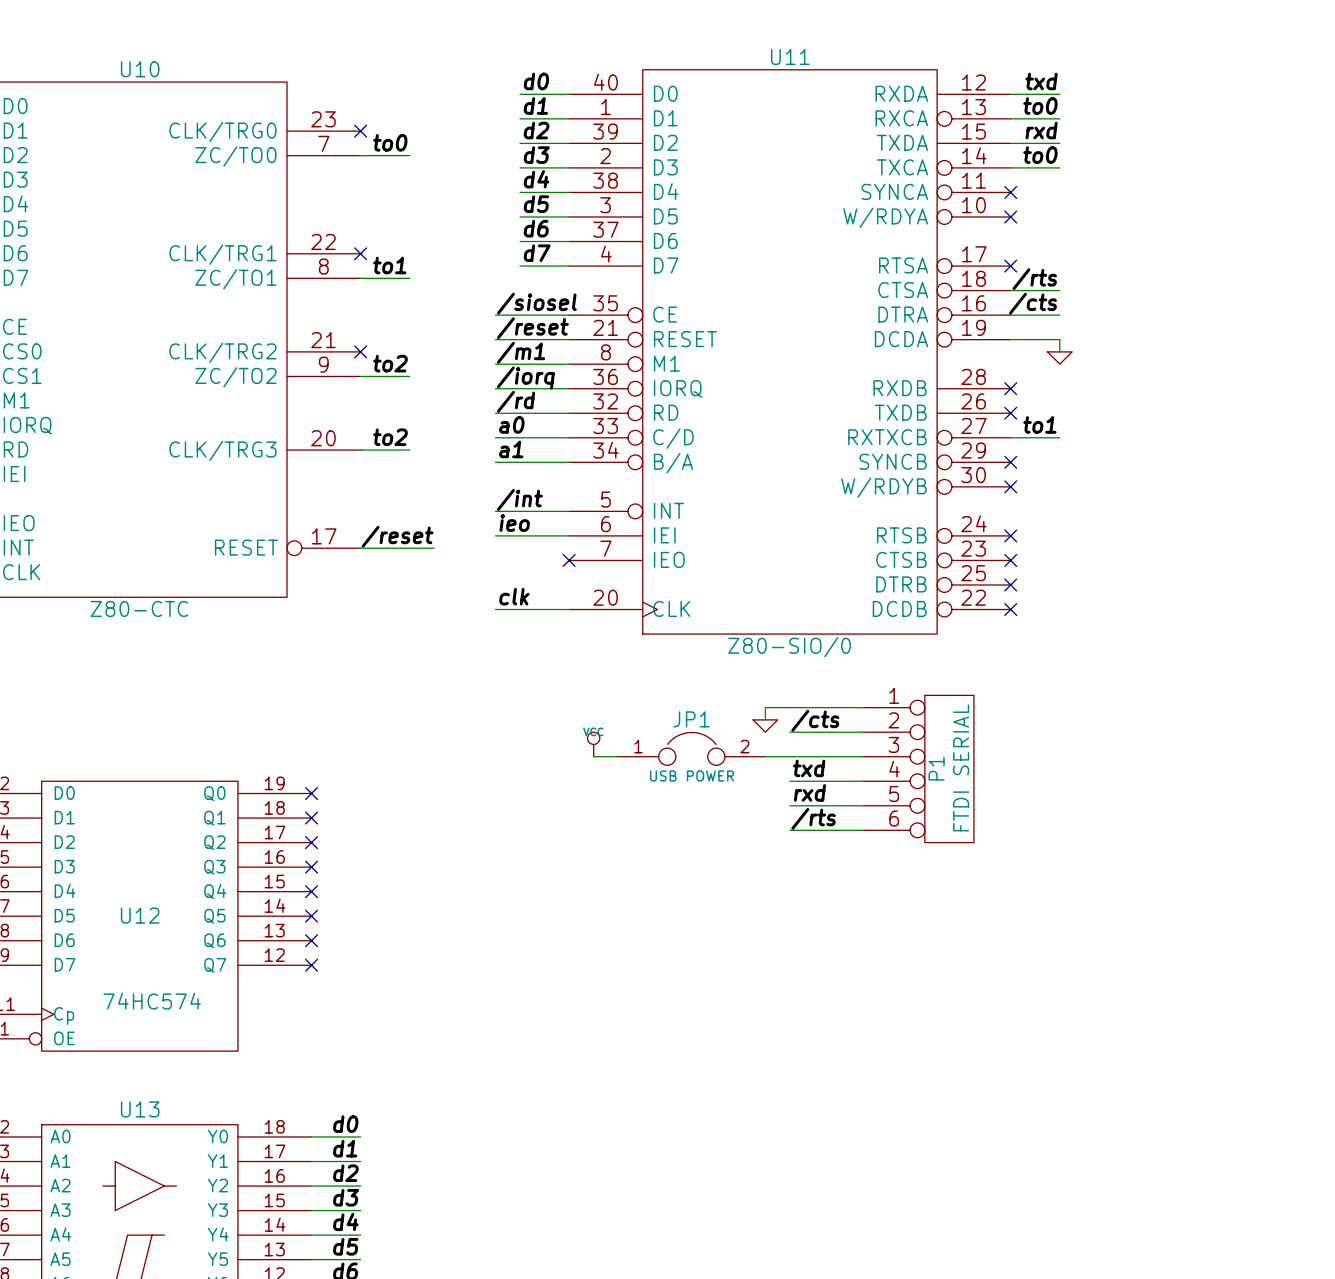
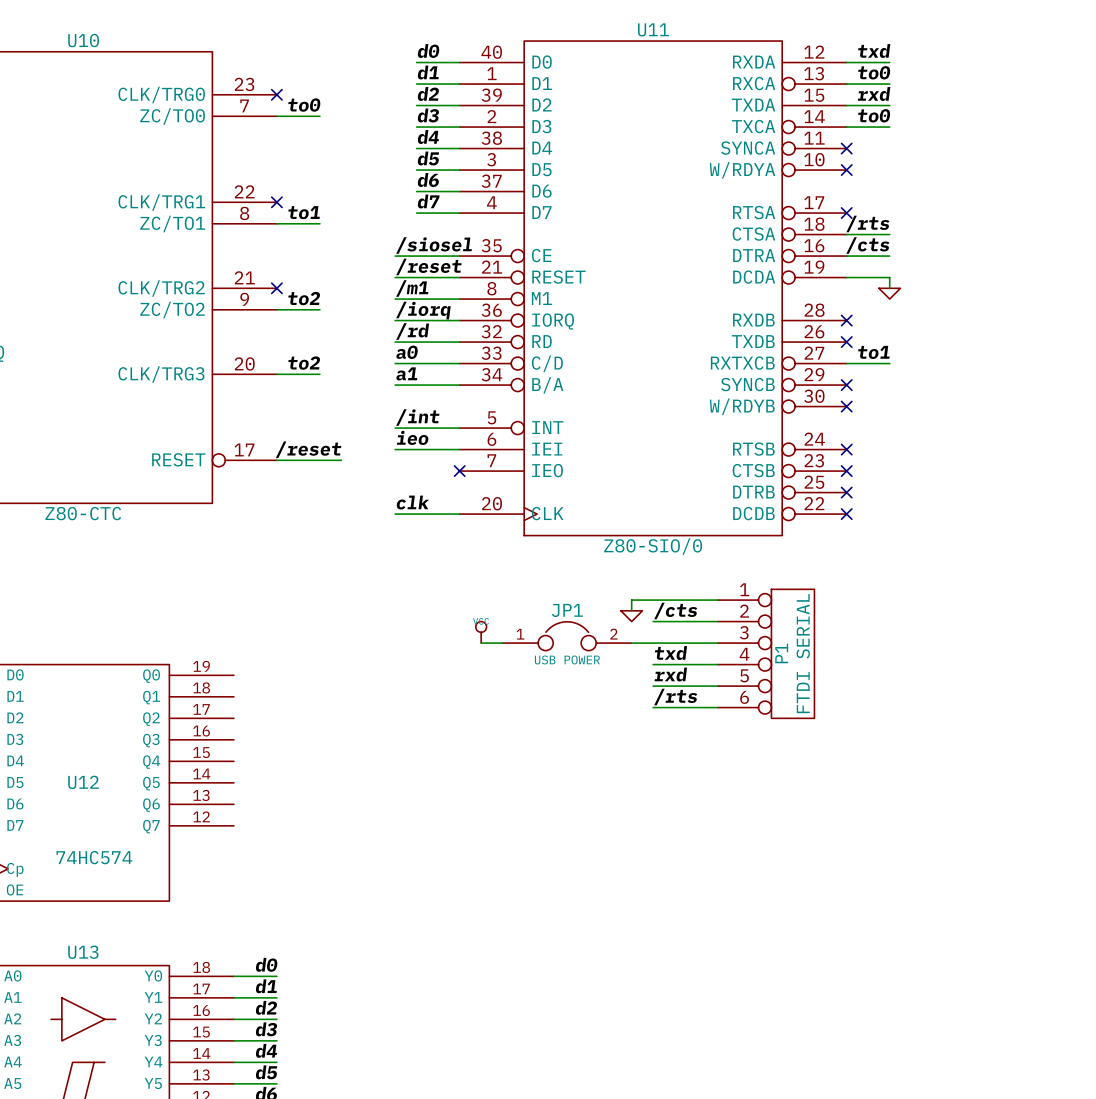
no-connect mark: (311, 793) -> none
no-connect mark: (311, 818) -> none
no-connect mark: (311, 842) -> none
no-connect mark: (311, 867) -> none
no-connect mark: (311, 891) -> none
no-connect mark: (311, 916) -> none
no-connect mark: (311, 940) -> none
no-connect mark: (311, 965) -> none

